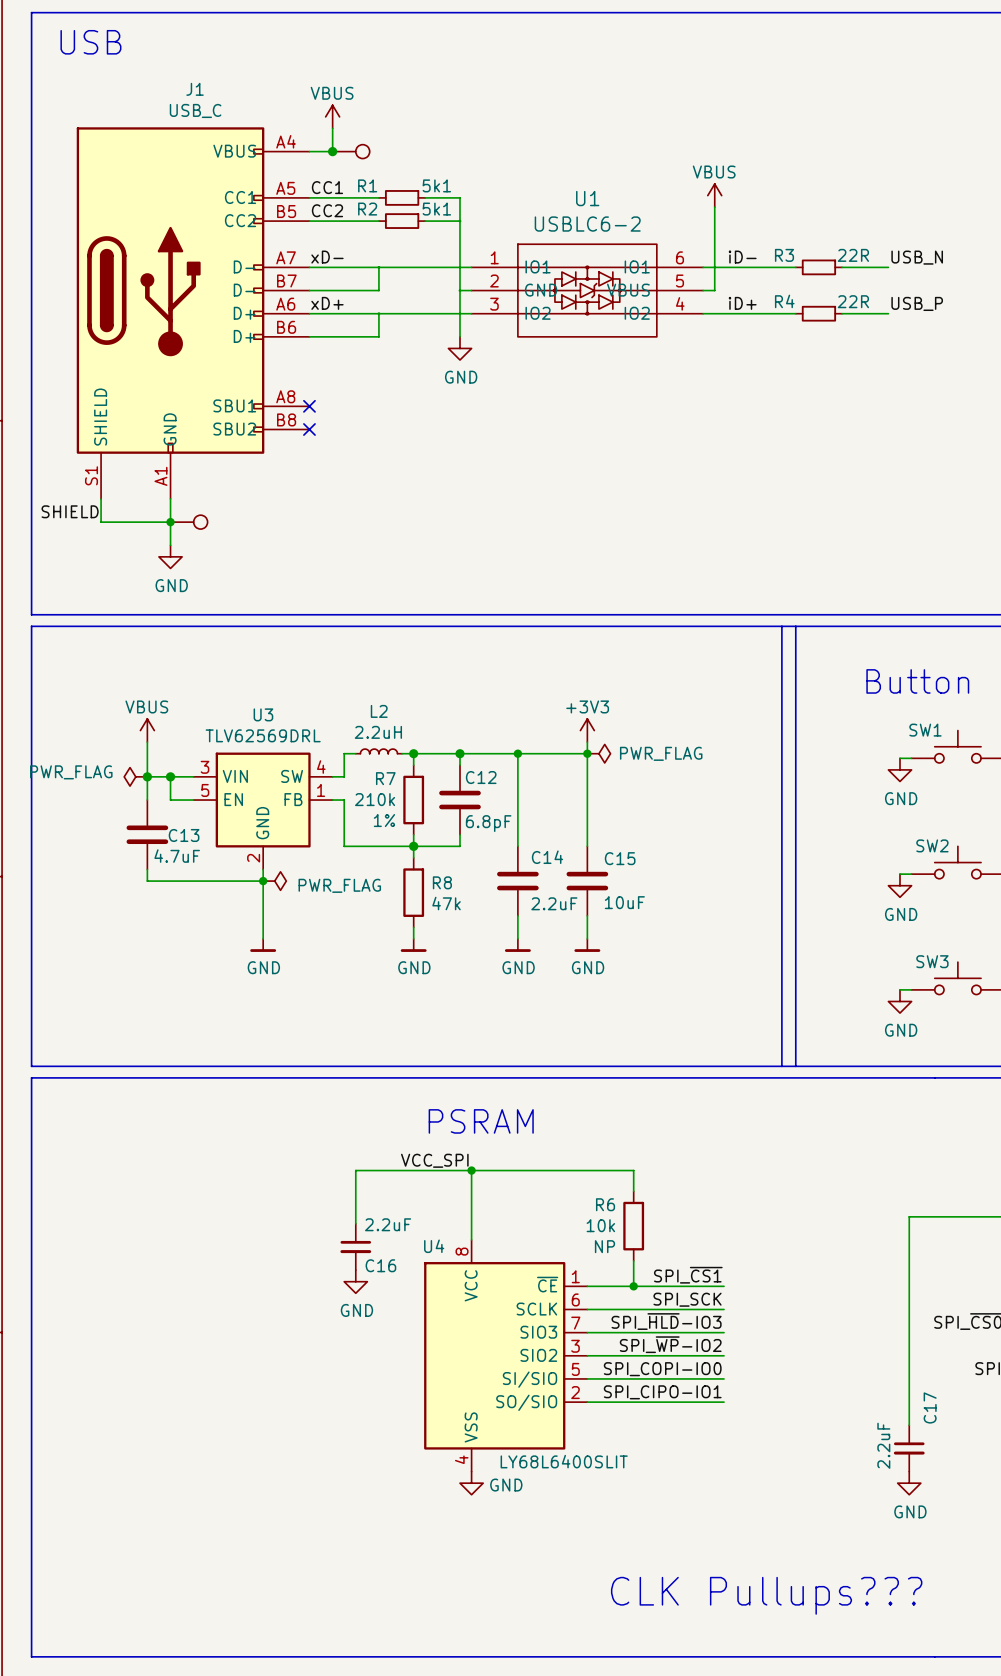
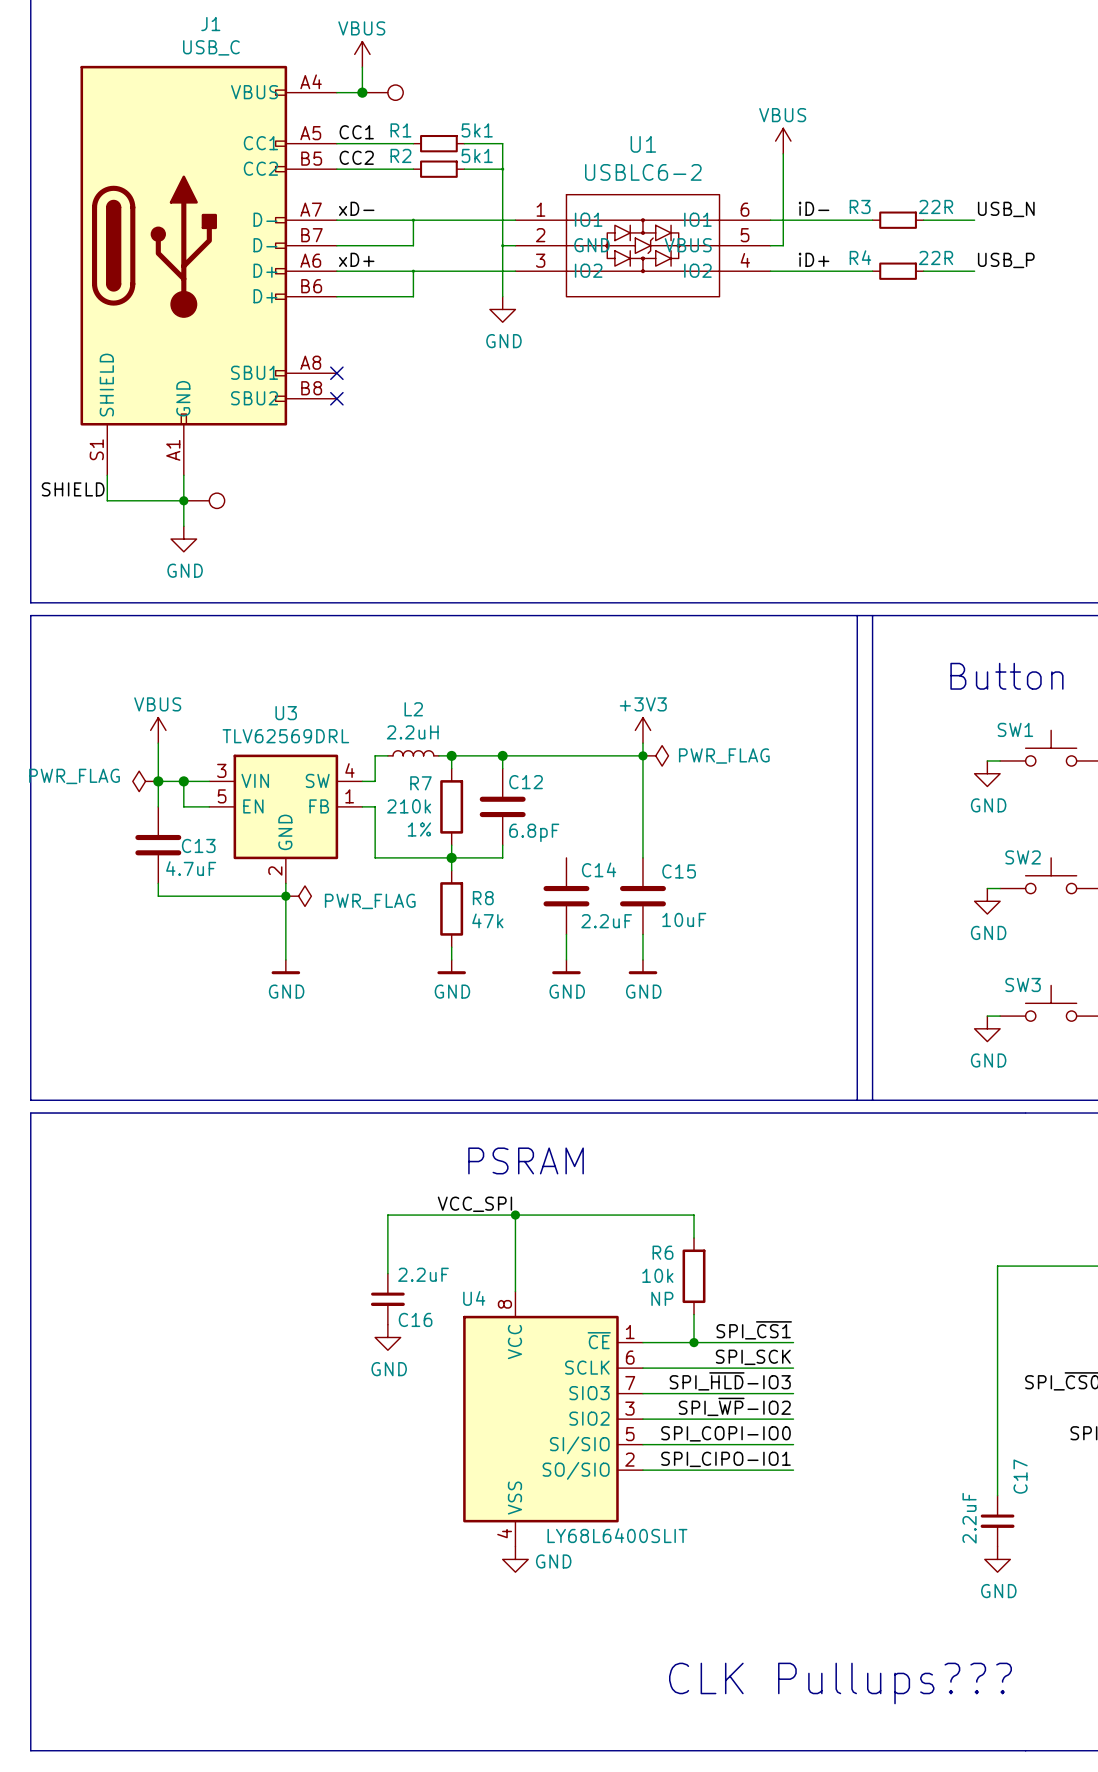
wire: (517, 753) (517, 846) -> none
junction: (517, 753) -> none

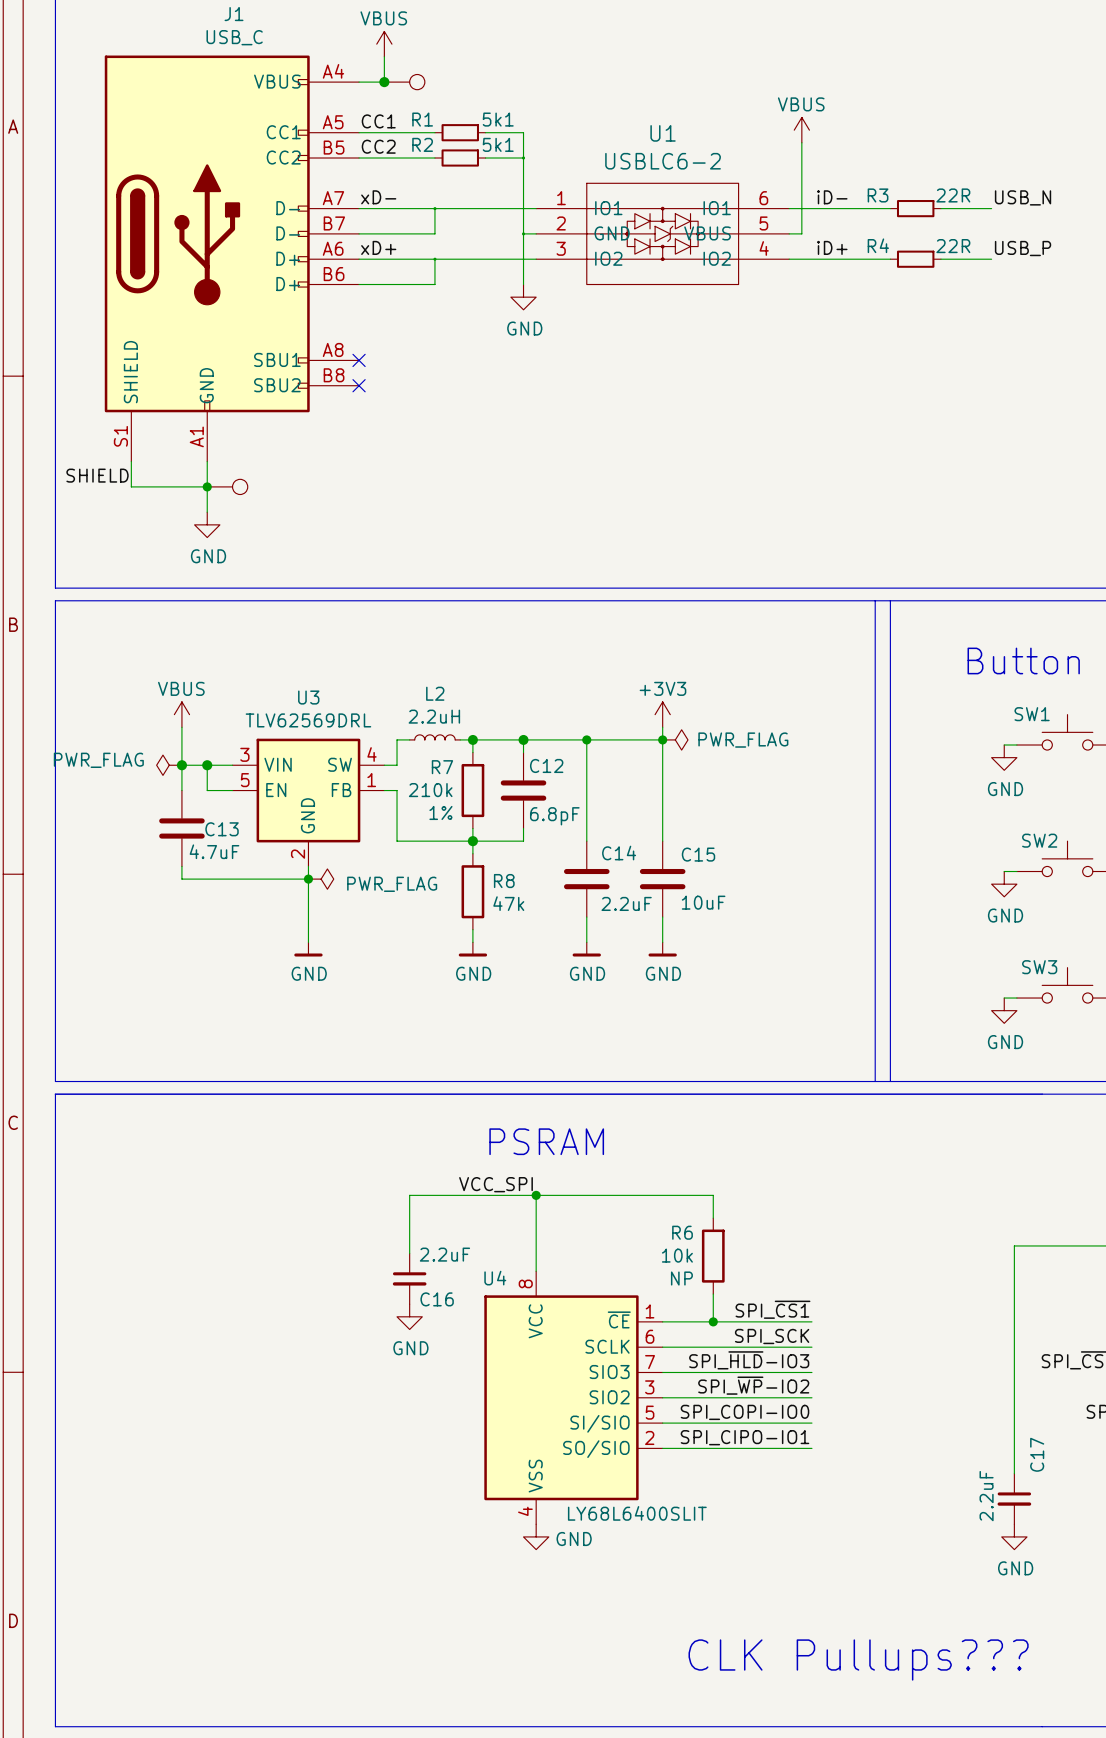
wire: none -> (586, 739) (586, 841)
junction: none -> (586, 739)

